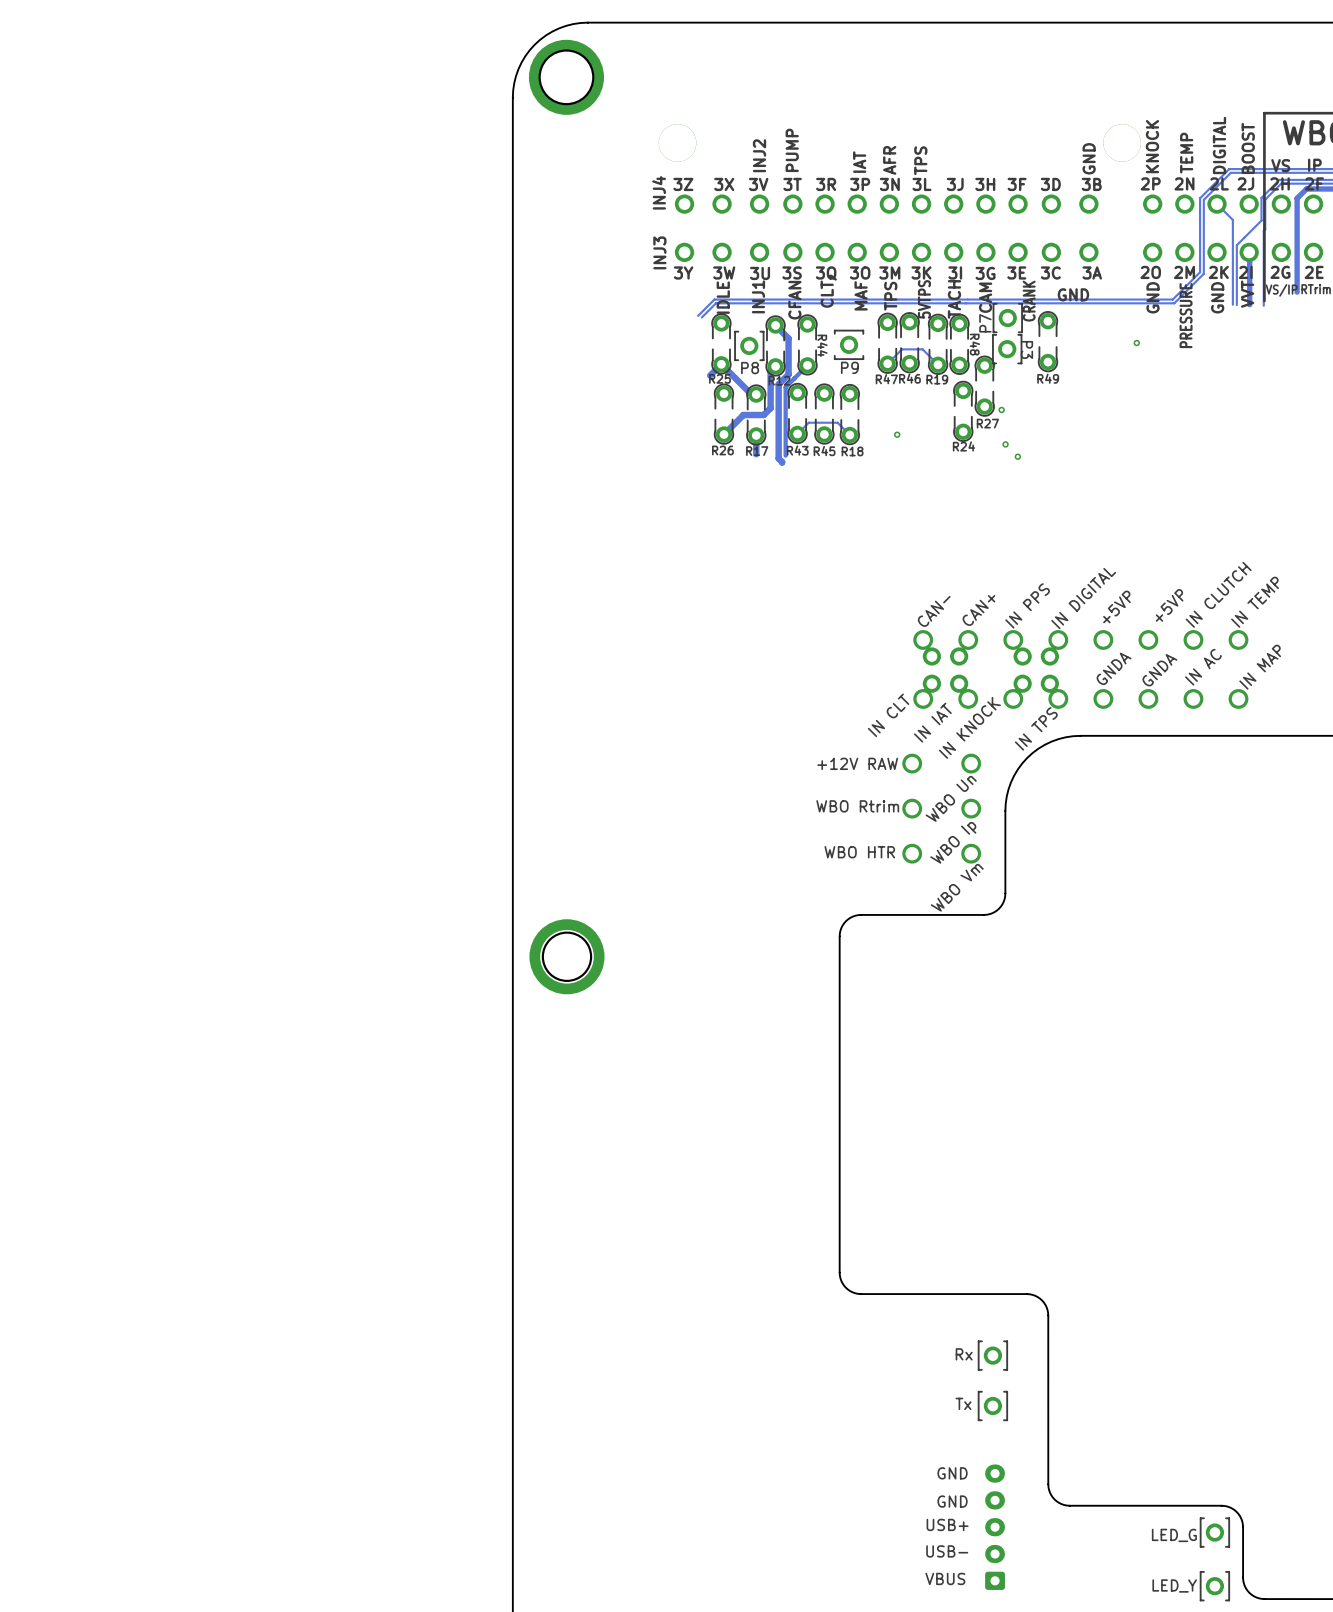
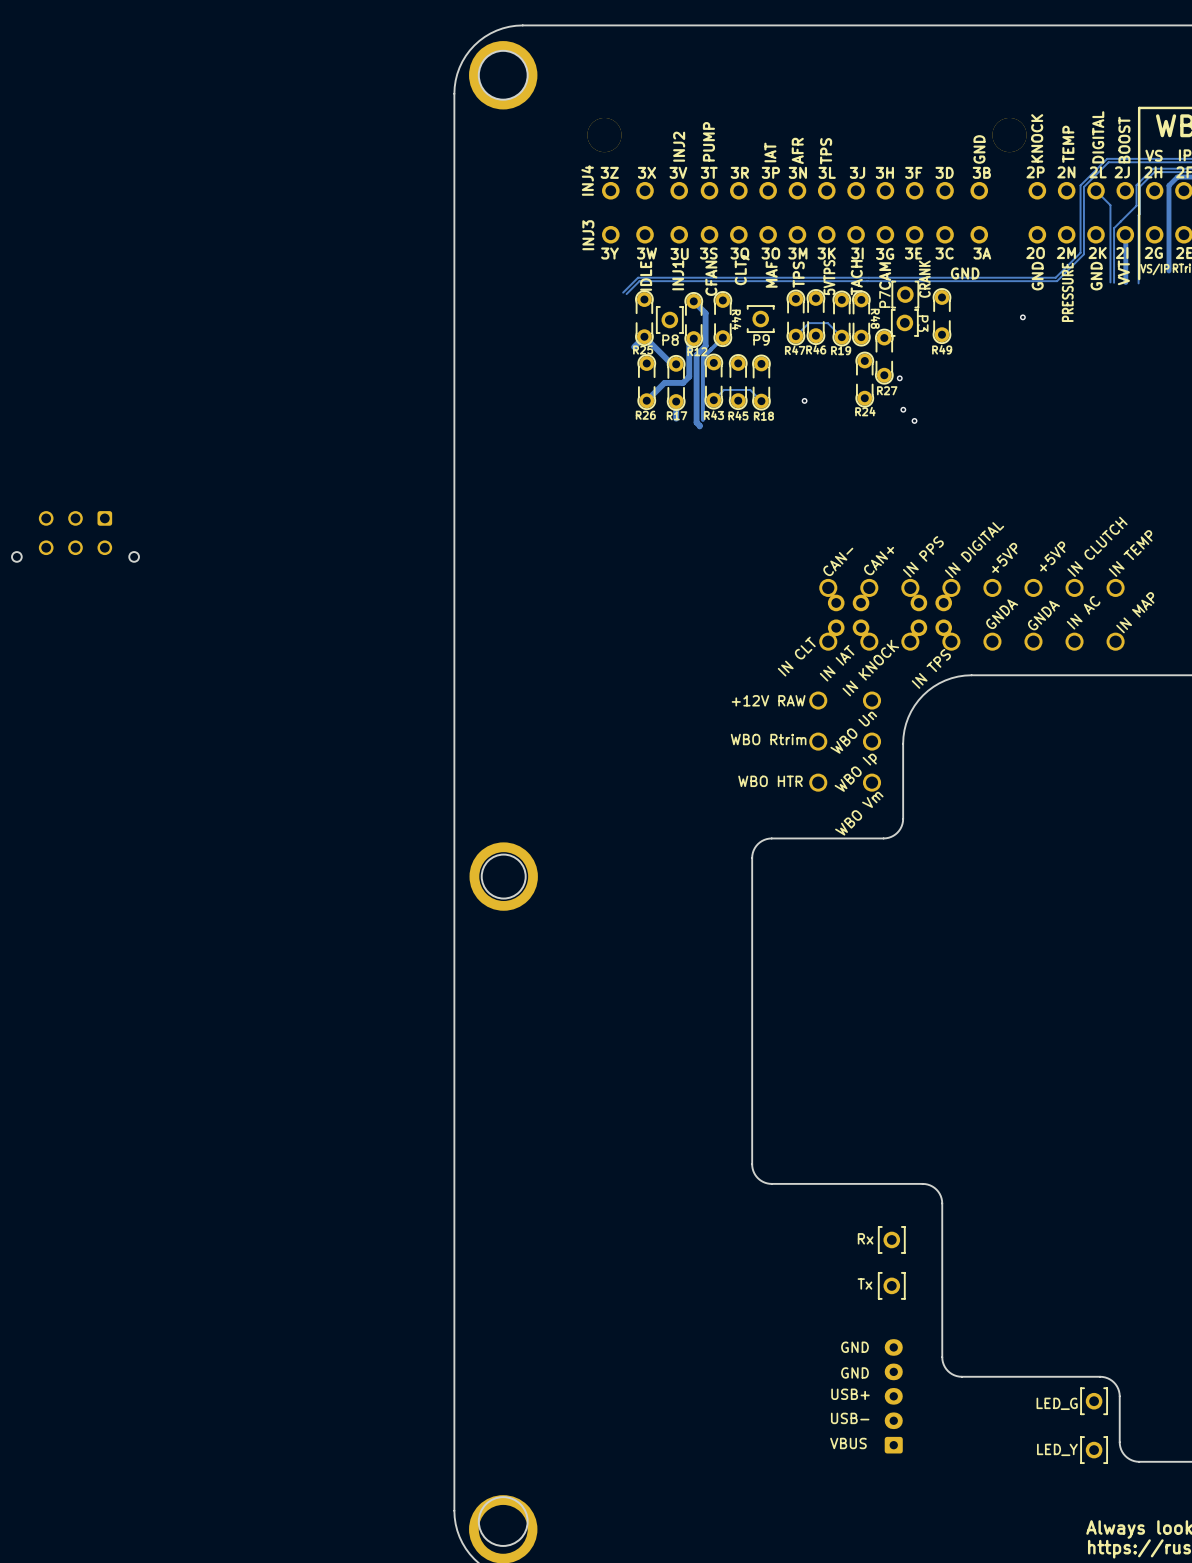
part: none -> (75, 536)

